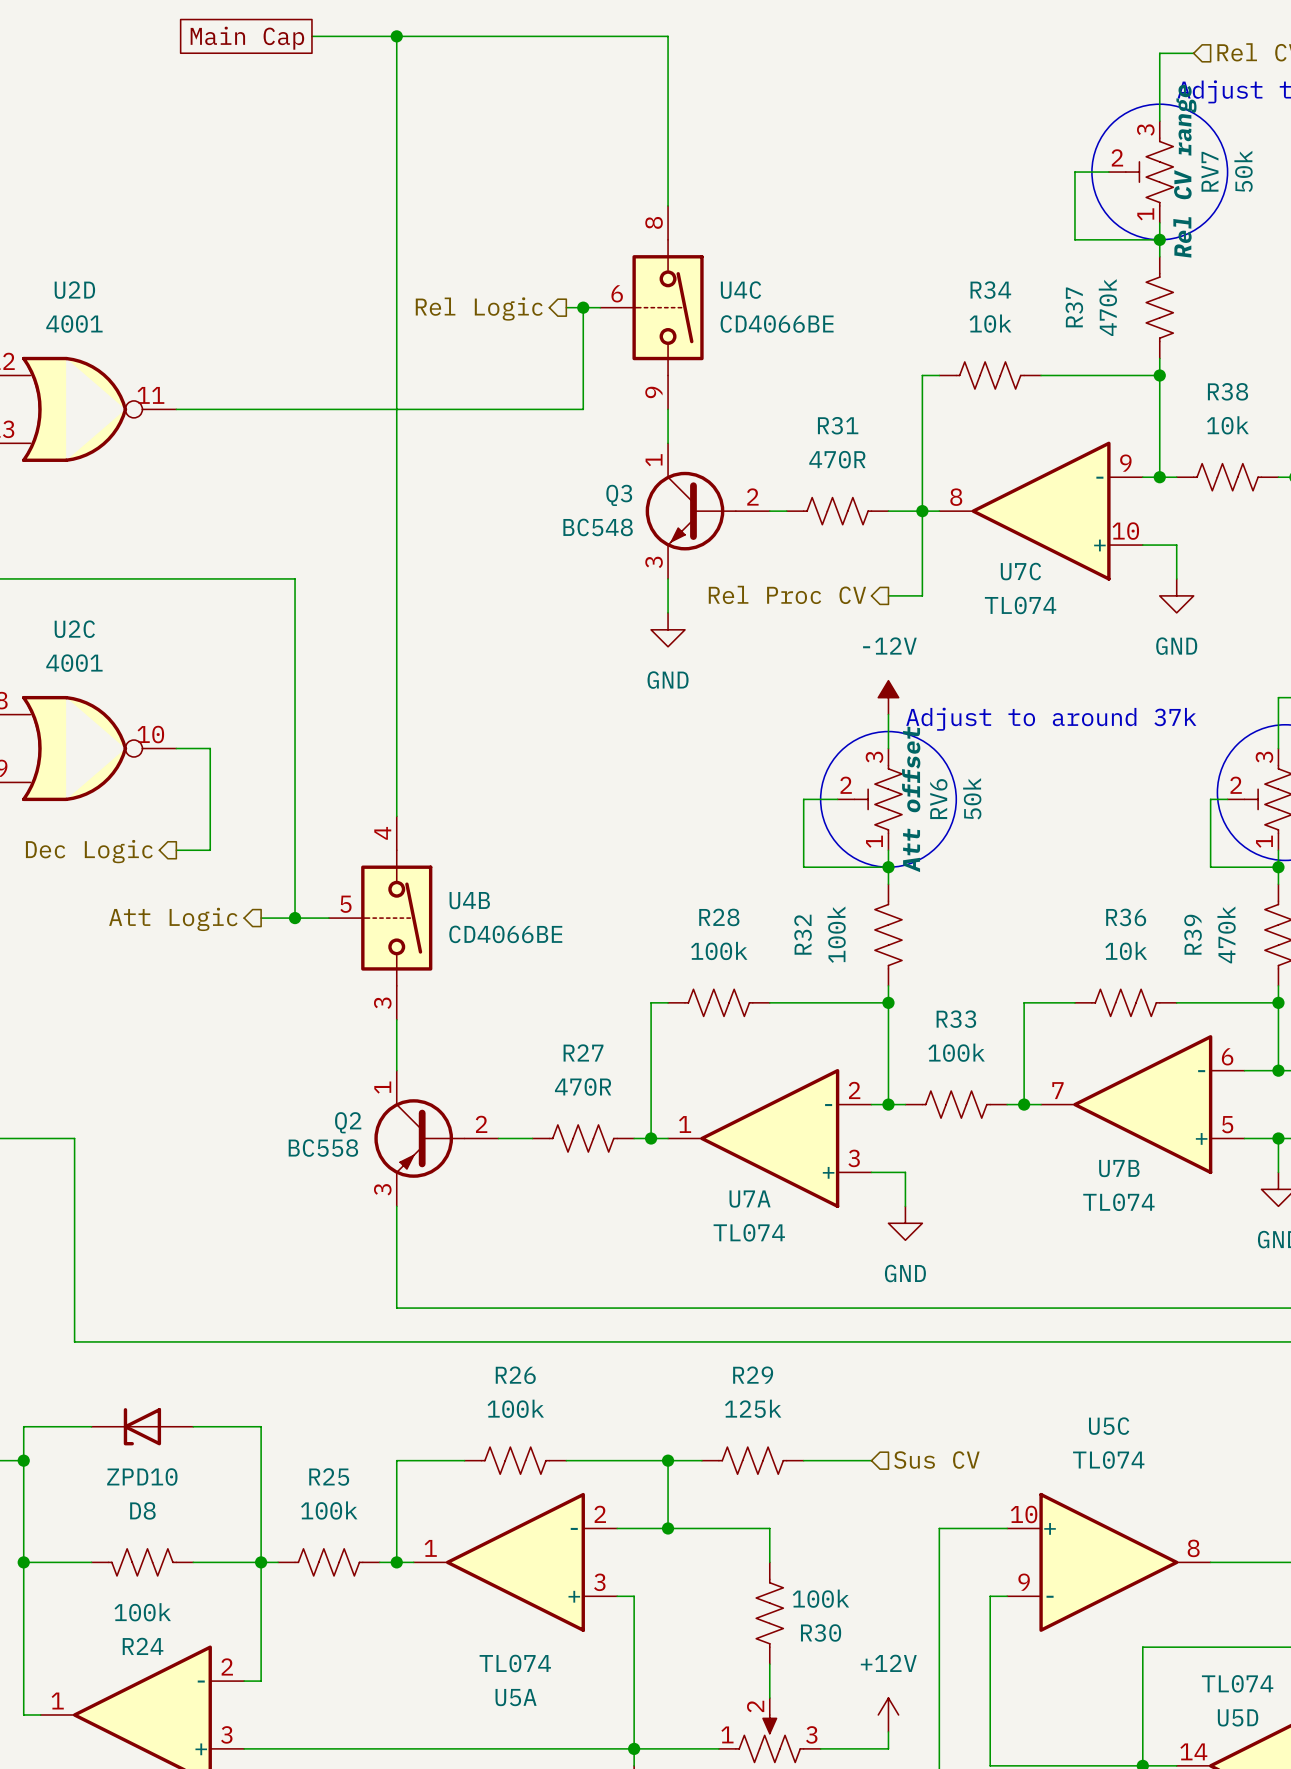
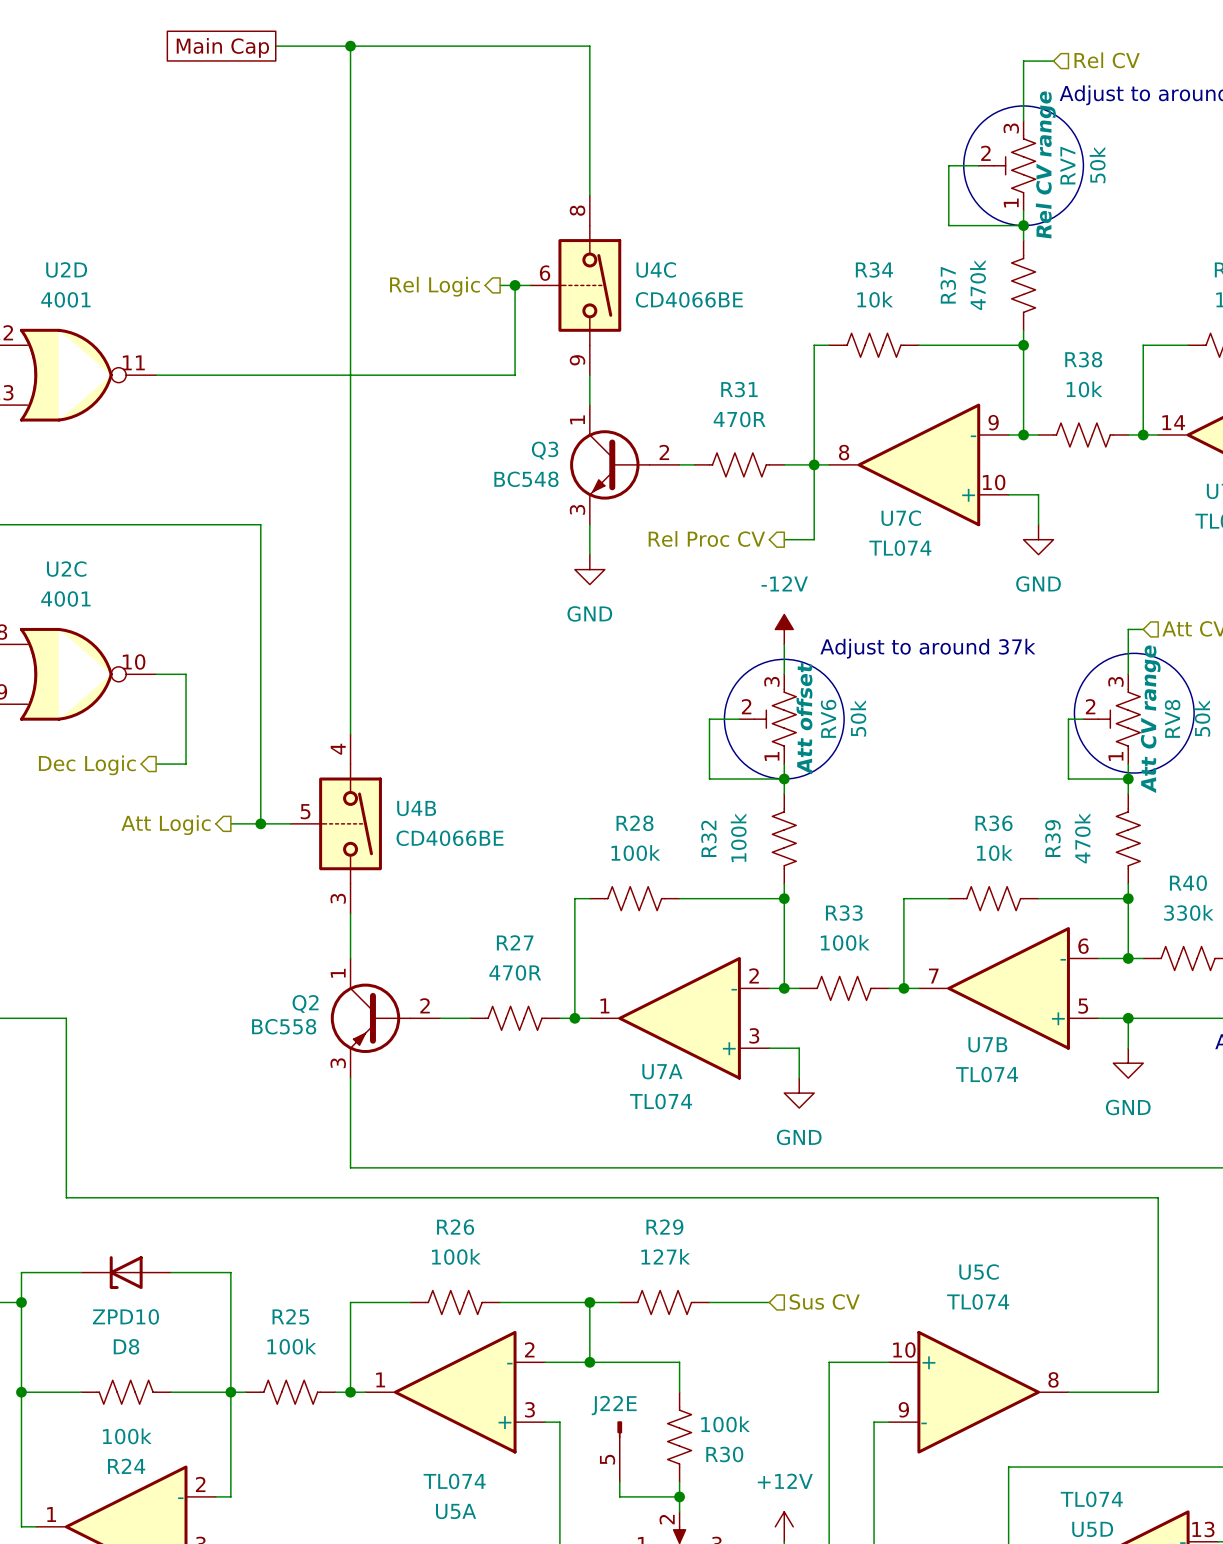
R29 value: 125k (753, 1408) -> 127k (665, 1256)
J22E: none -> (619, 1451)
wire: none -> (619, 1481) (619, 1496) (679, 1496)
junction: none -> (679, 1496)

